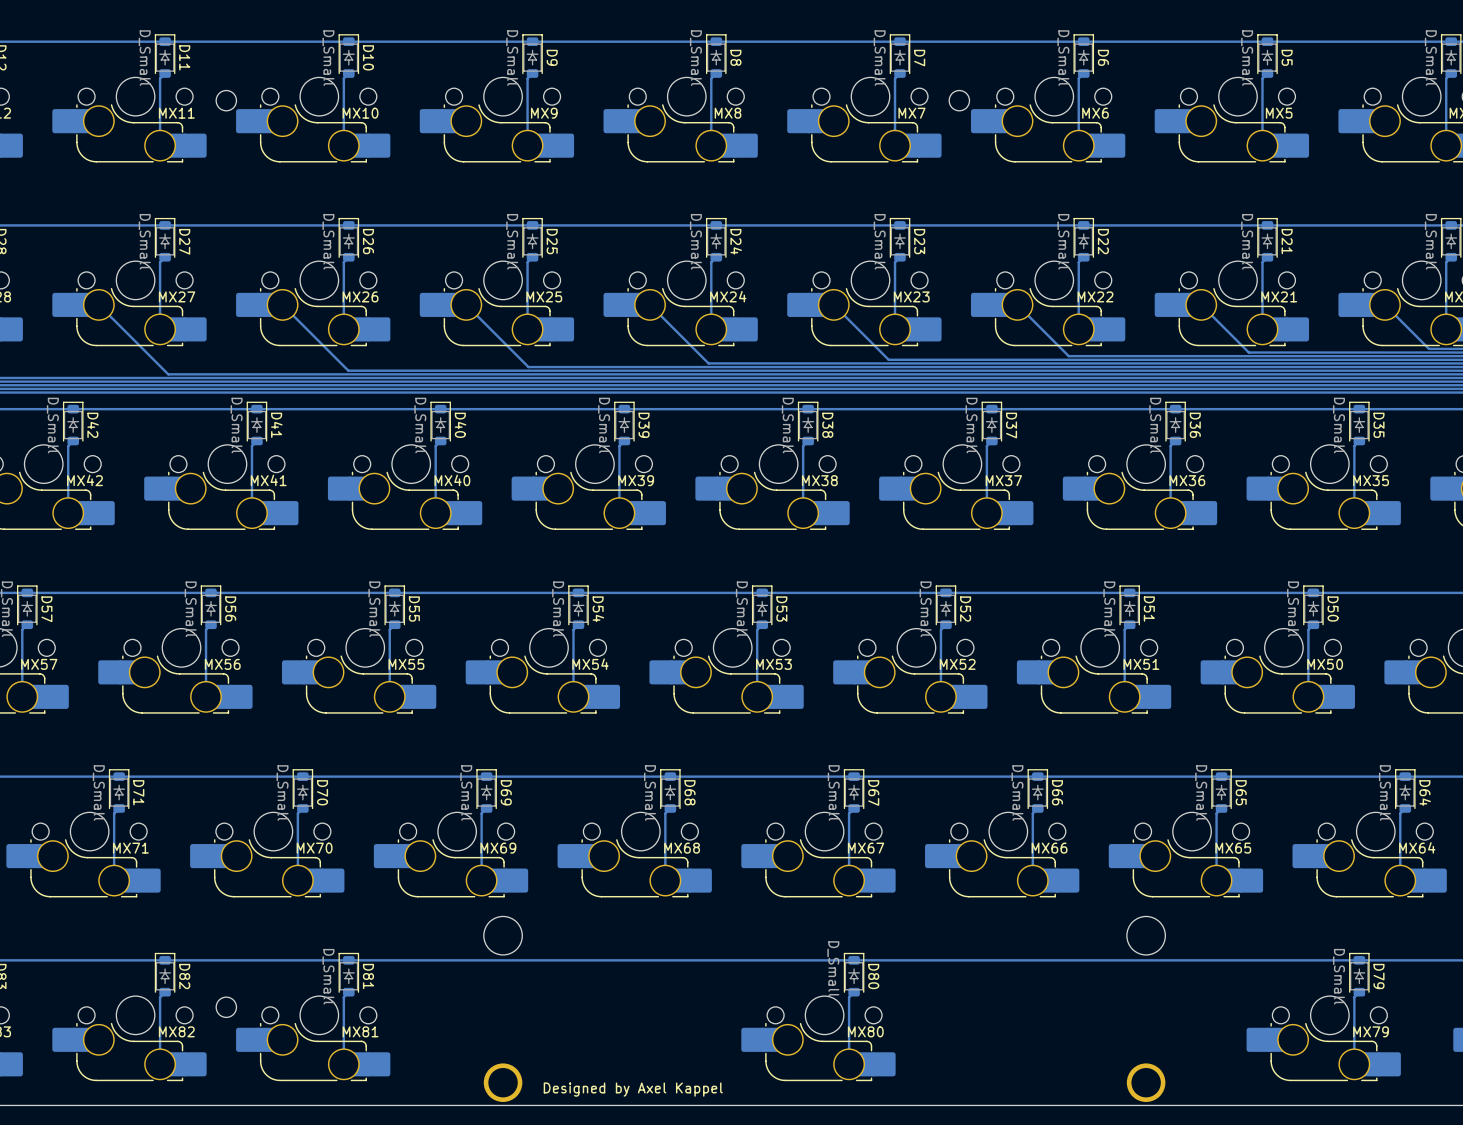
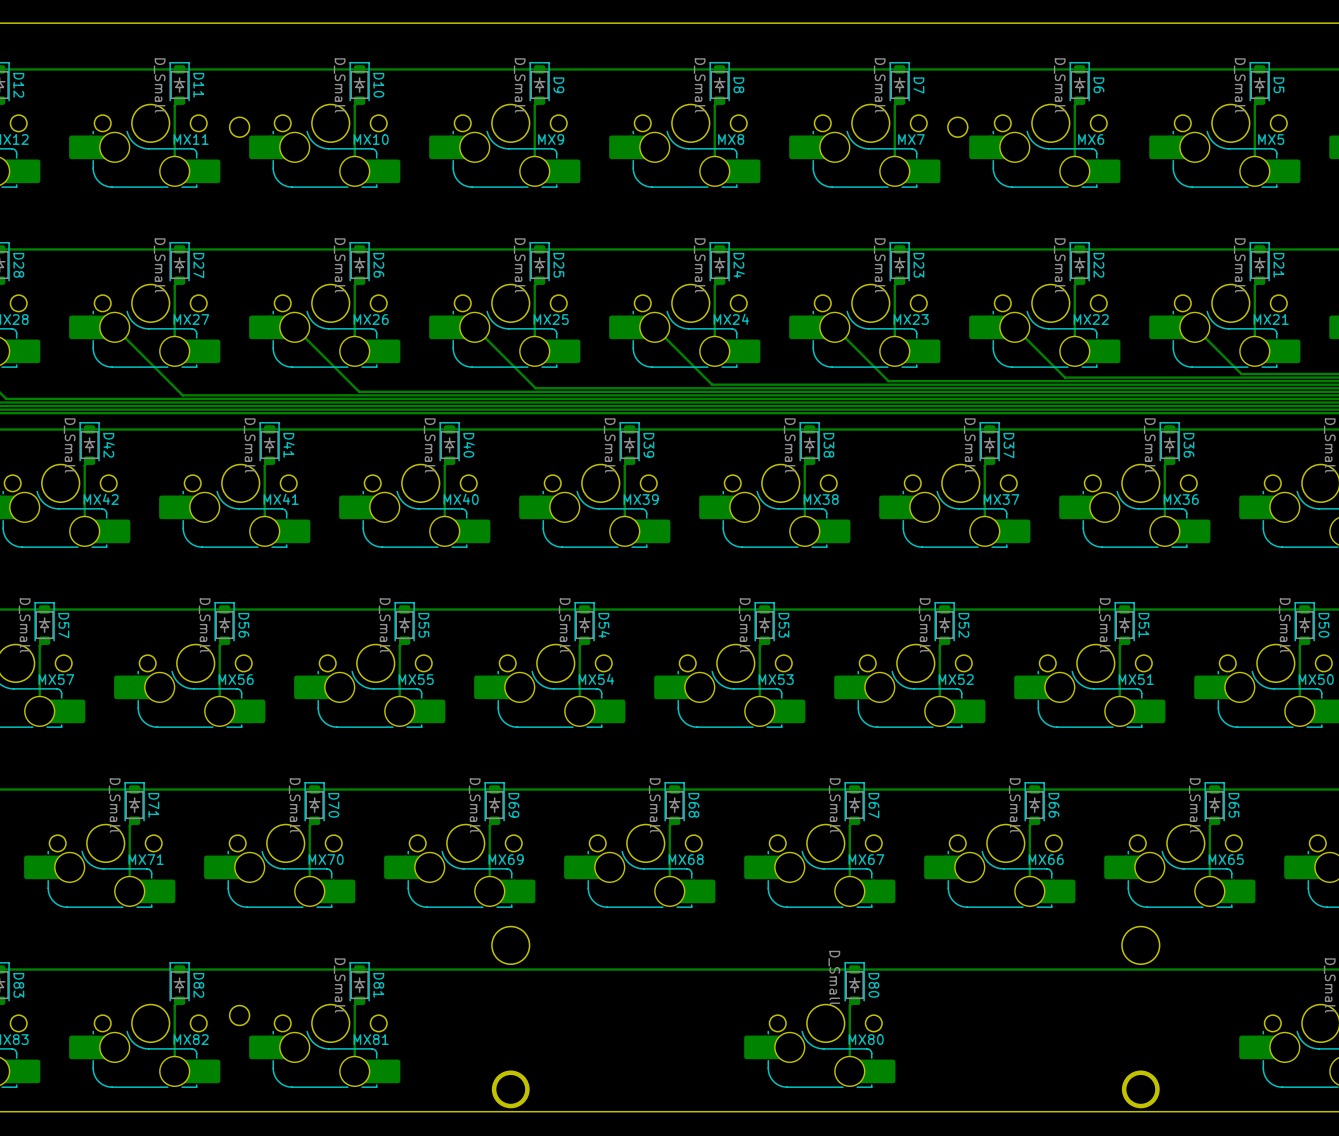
text: Designed by Axel Kappel (633, 1089) -> none

